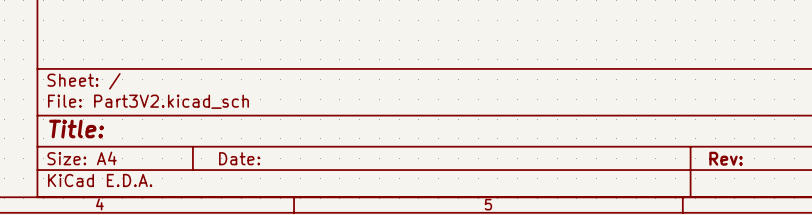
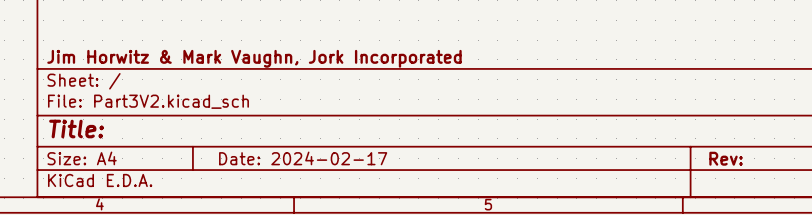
title block: none -> Jim Horwitz & Mark Vaughn, Jork Incorporated (254, 58)
title block: Date: (239, 158) -> Date: 2024-02-17 (303, 158)

